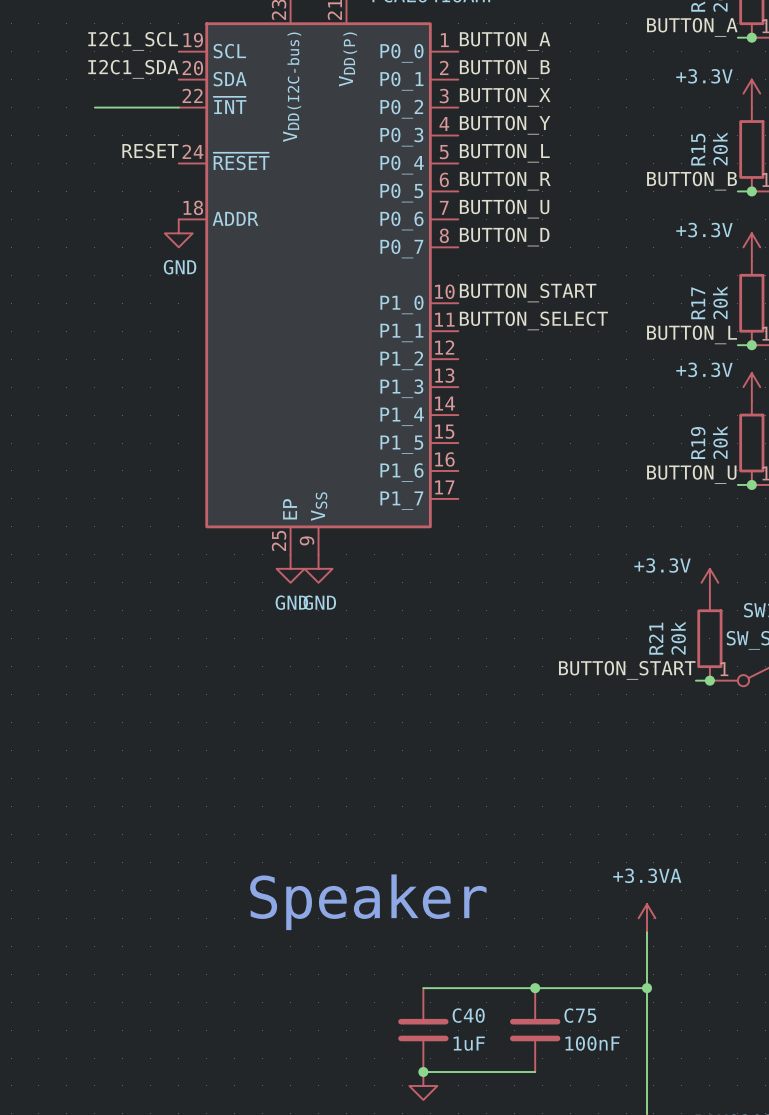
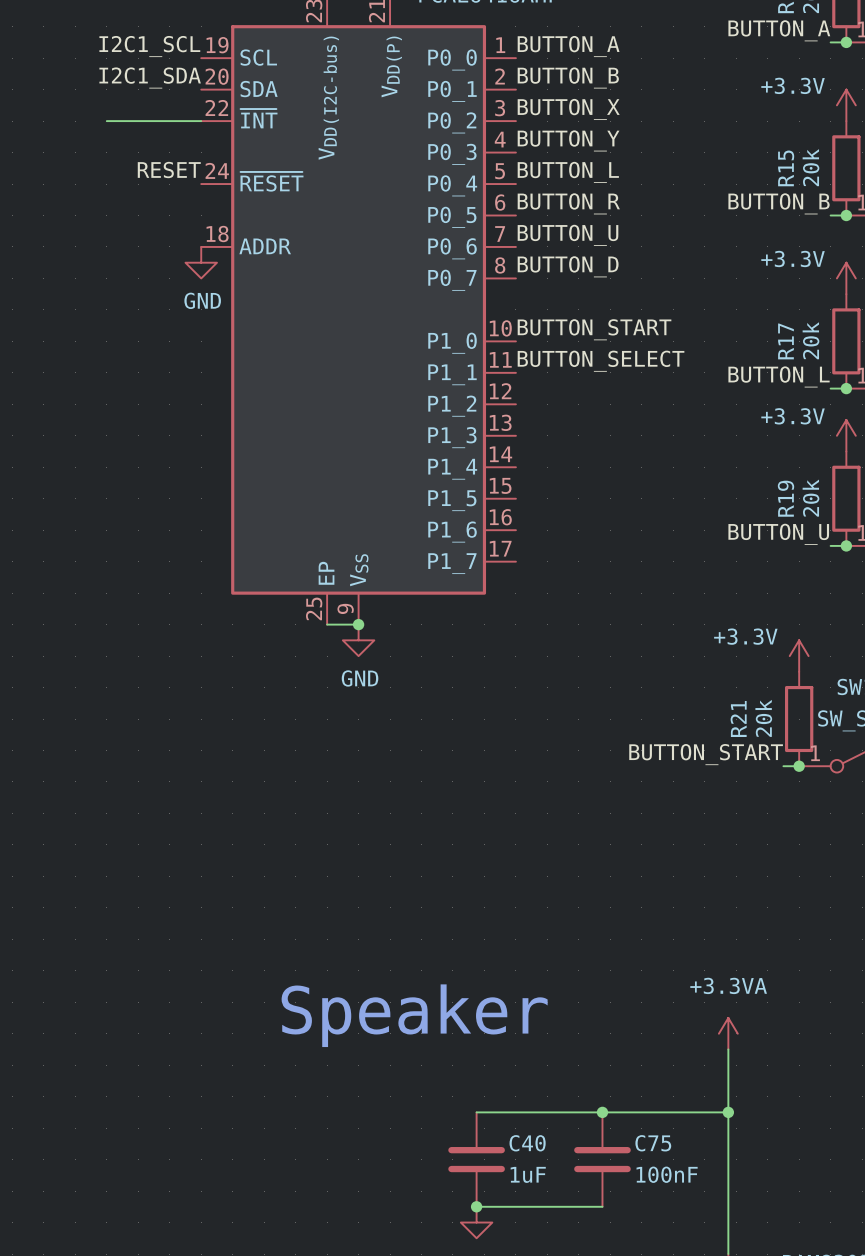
wire: none -> (327, 624) (358, 624)
junction: none -> (358, 624)
power symbol: GND (290, 568) -> none

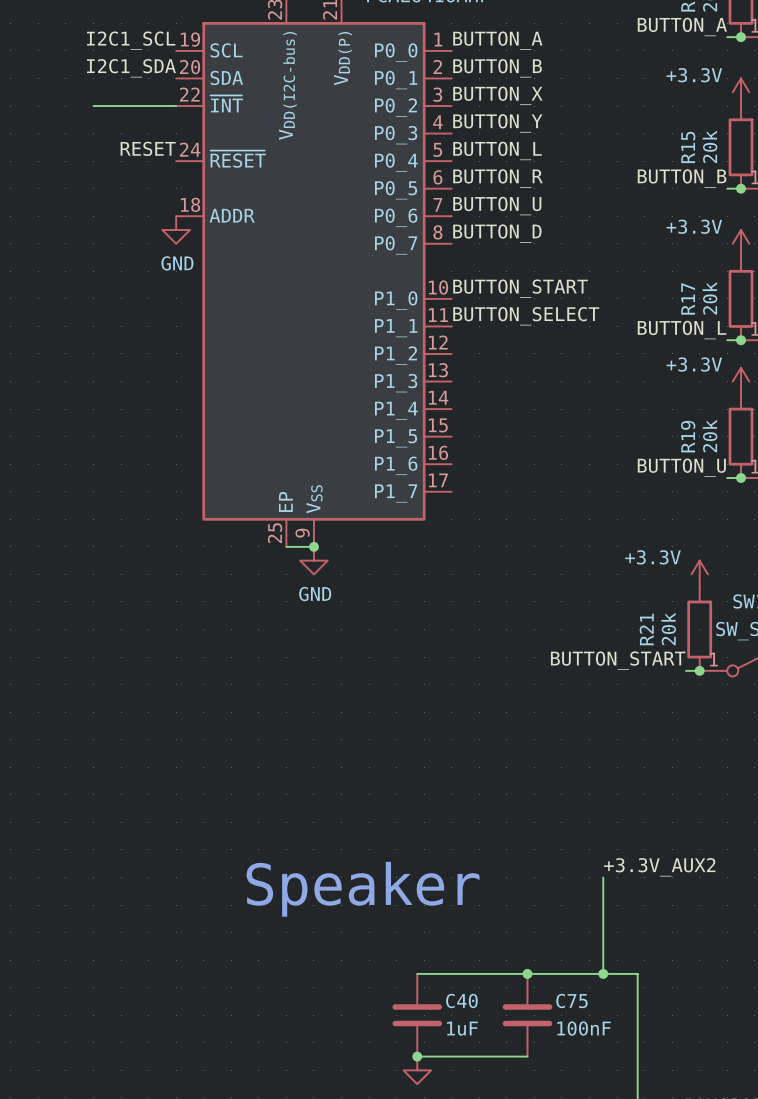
label: none -> +3.3V_AUX2 (659, 867)
wire: none -> (603, 877) (603, 973)
power symbol: +3.3VA (728, 1033) -> none
wire: (728, 1049) (728, 1112) -> none
junction position: (728, 1112) -> (603, 973)

